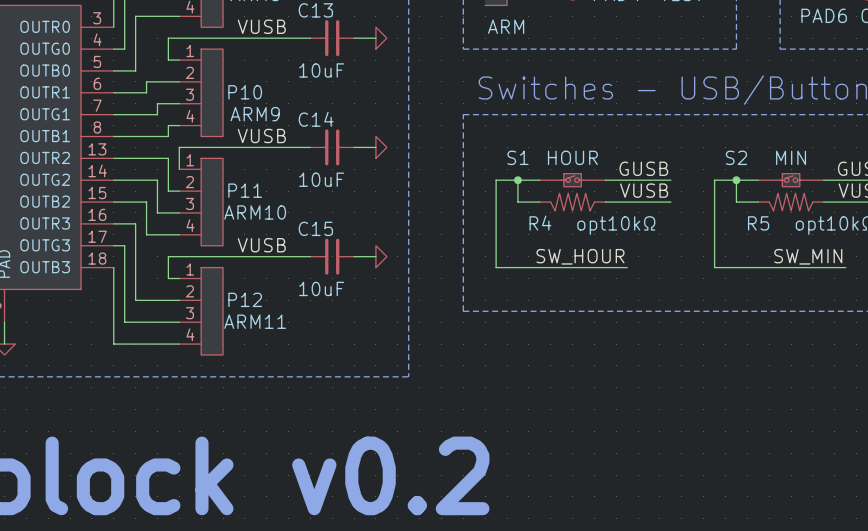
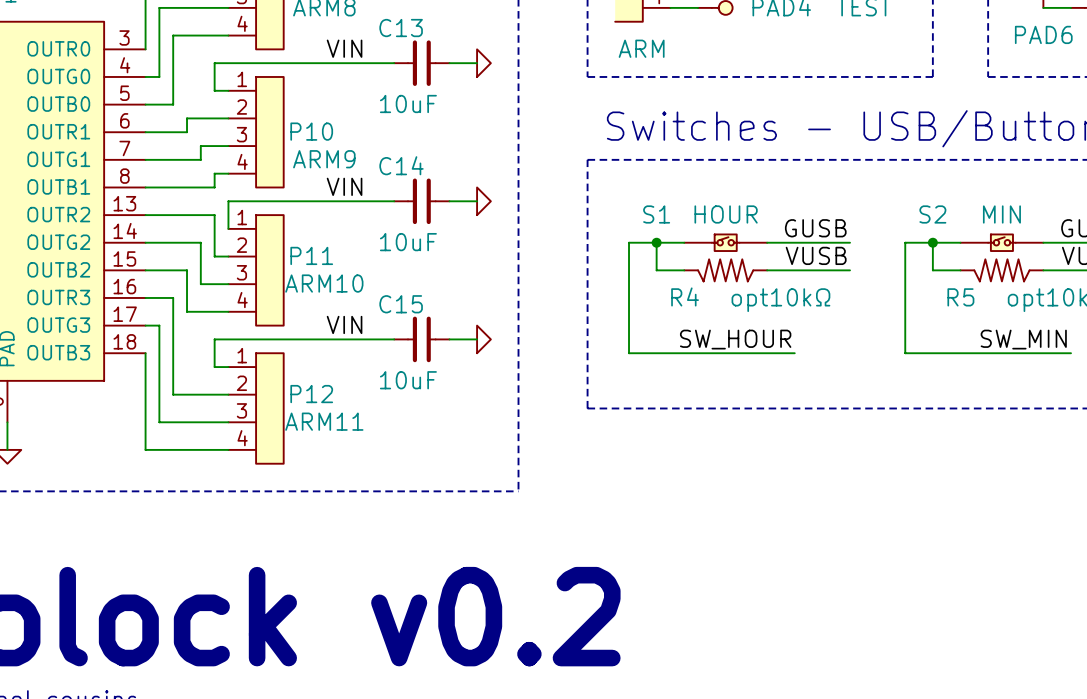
label: VUSB (261, 26) -> VIN (344, 48)
label: VUSB (261, 135) -> VIN (344, 186)
label: VUSB (261, 245) -> VIN (344, 324)

